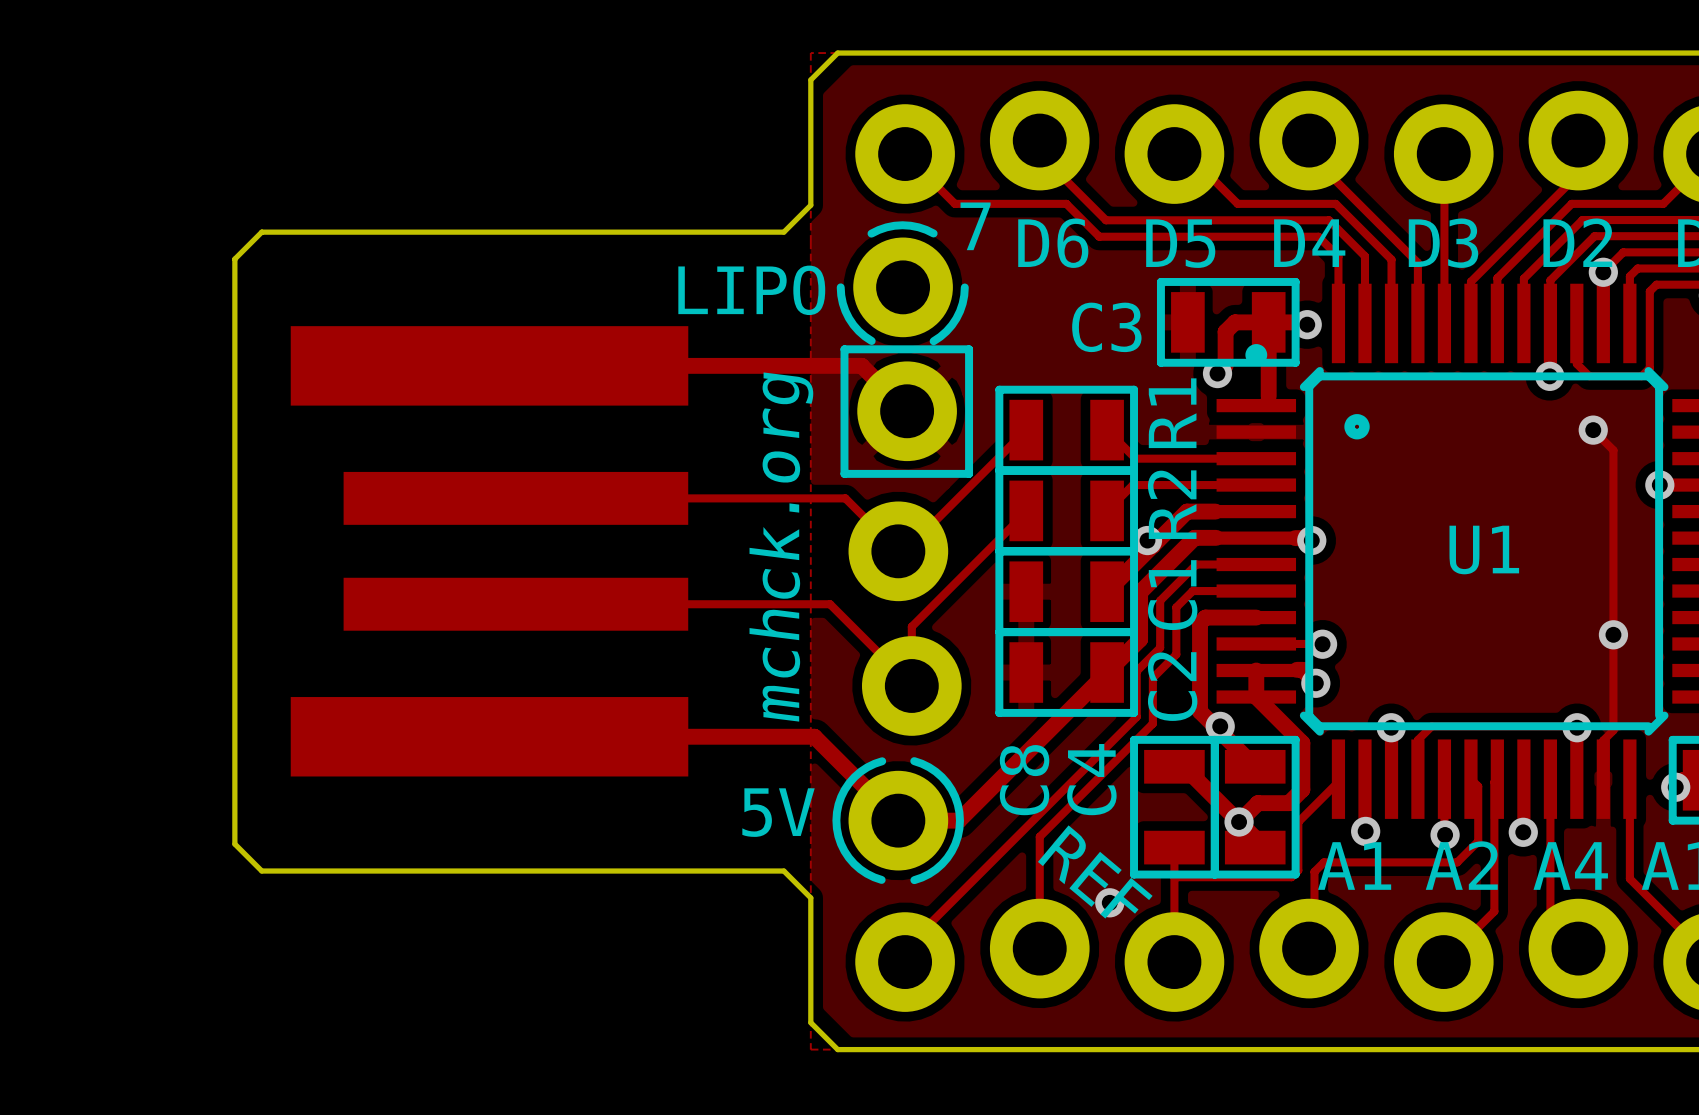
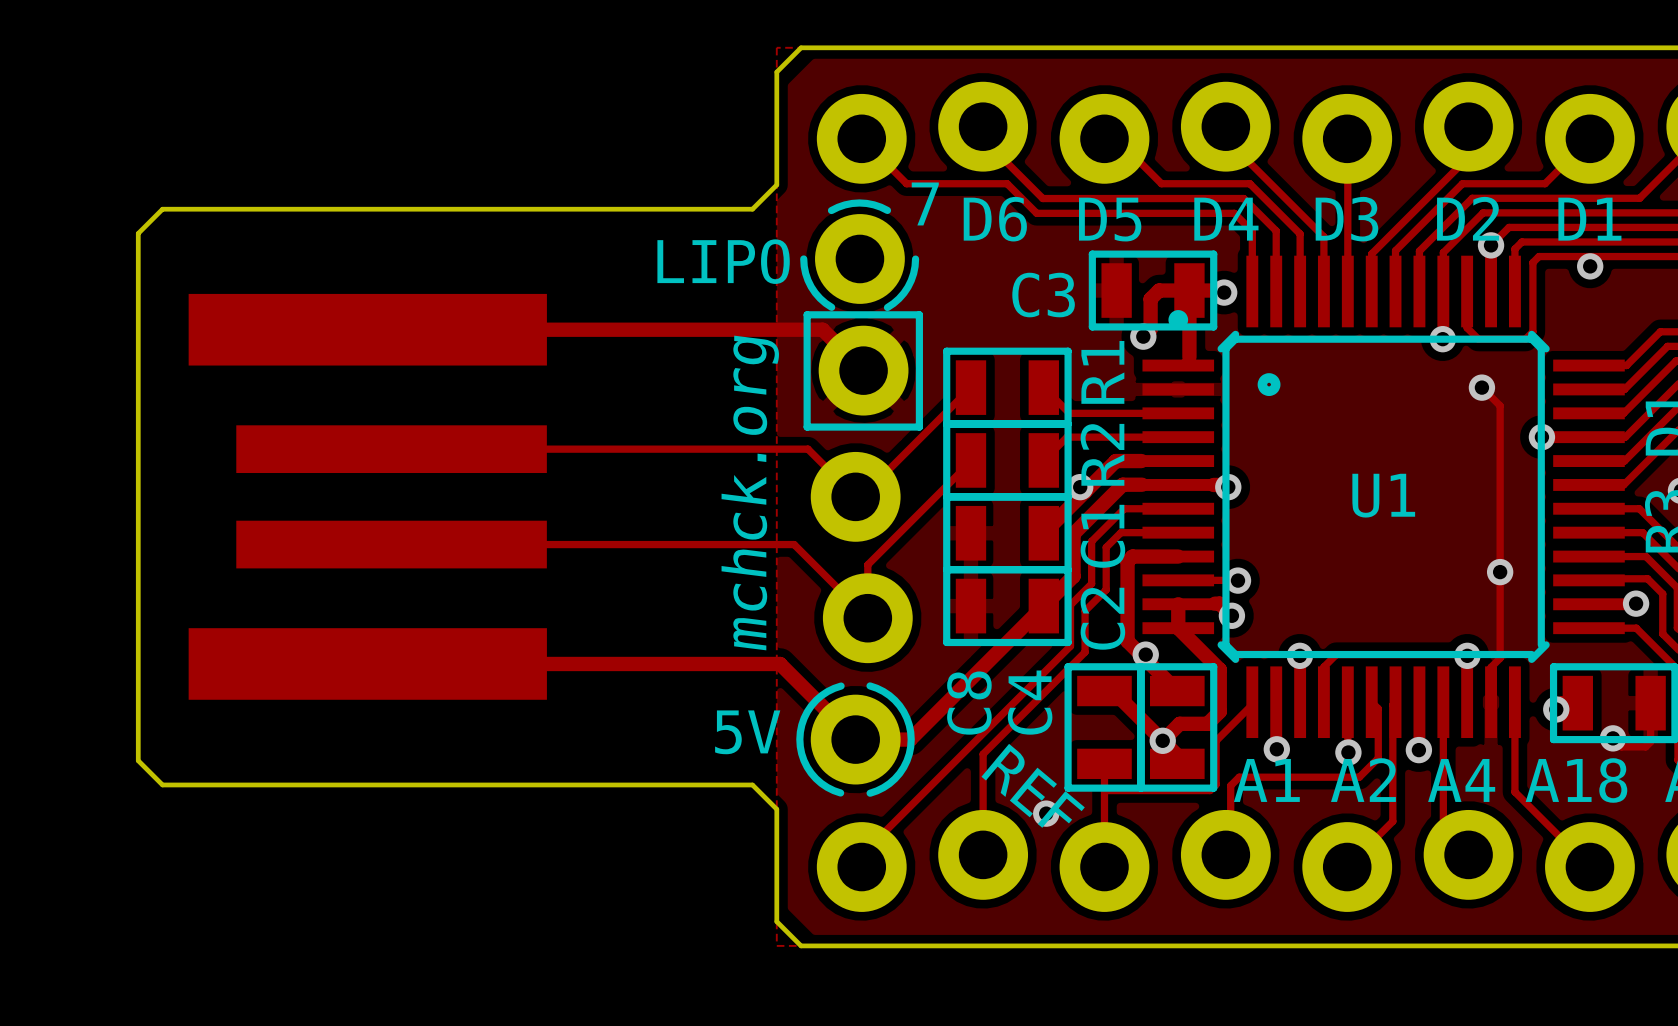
board edge: (261, 232) (234, 259) (234, 844) (261, 871) -> (282, 209) (162, 209) (138, 233) (138, 760) (162, 784) (282, 784)
part position: (489, 551) -> (367, 496)

